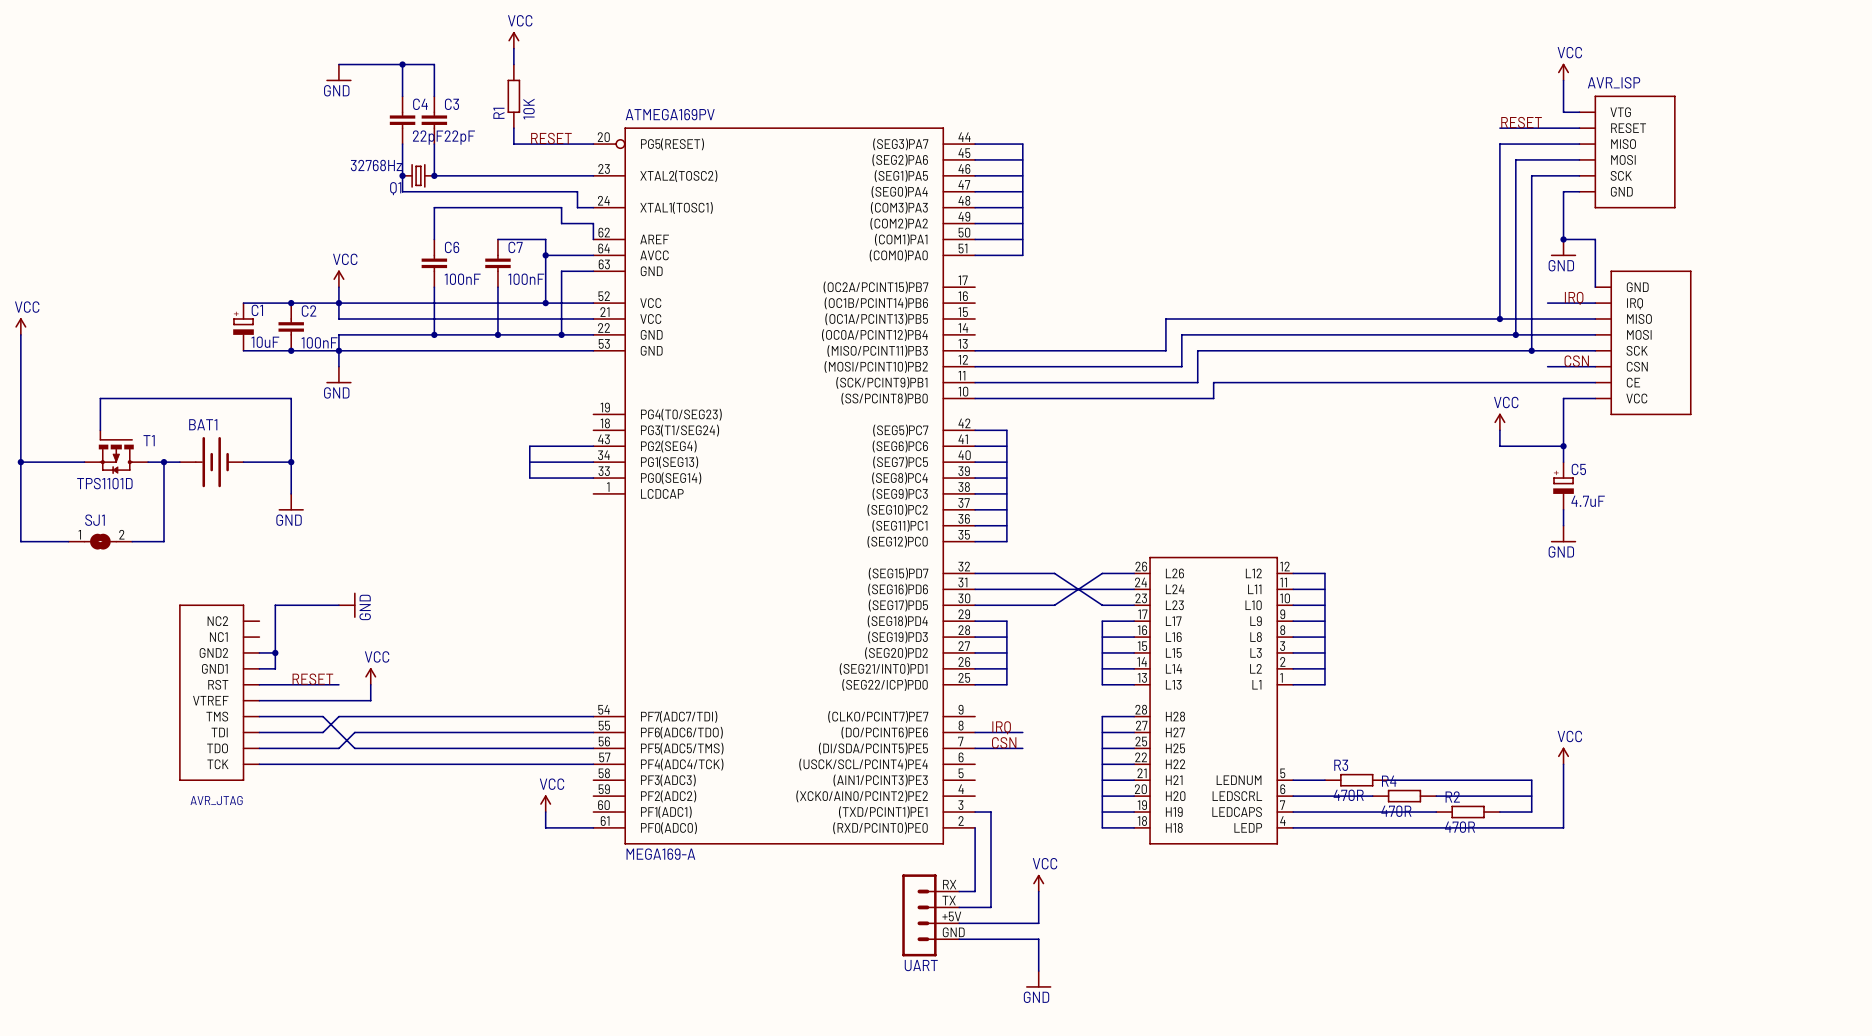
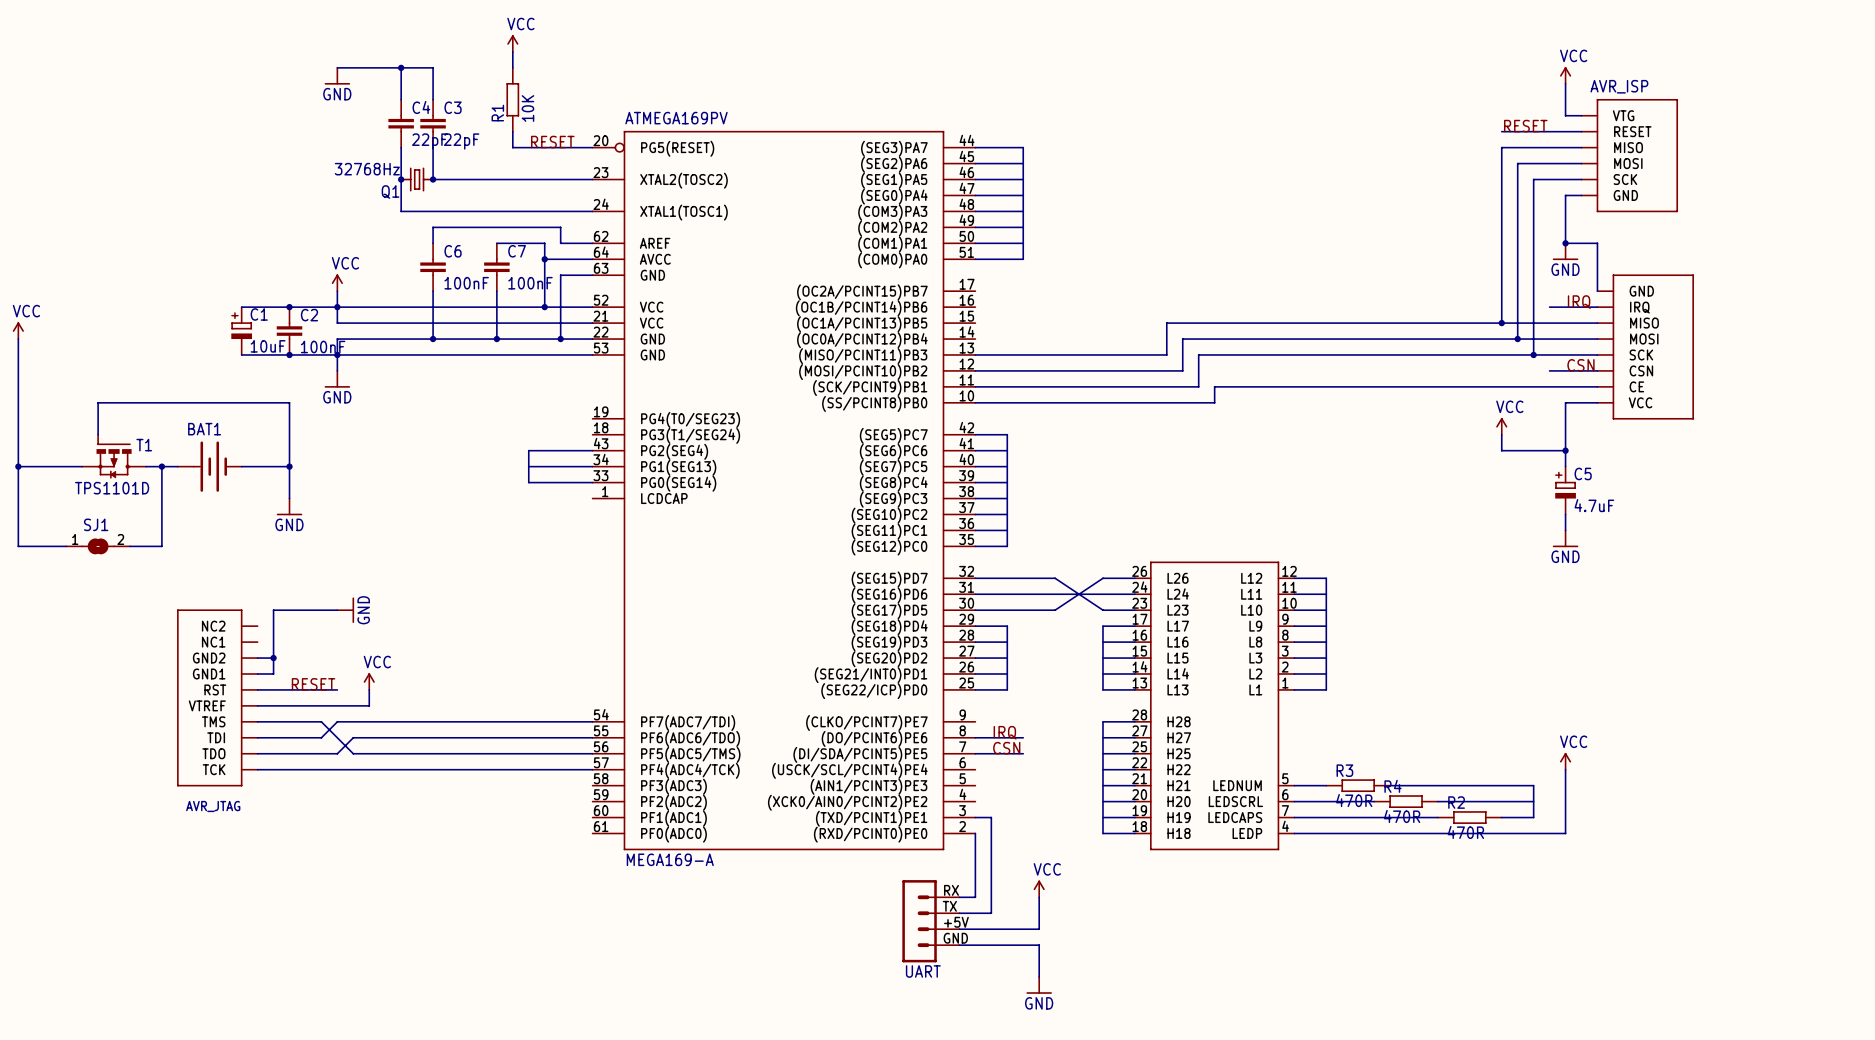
wire: (402, 191) (577, 191) (577, 207) -> none
wire: (434, 207) (434, 223) -> (433, 211) (401, 211) (401, 195)
wire: (561, 207) (561, 223) (593, 223) (593, 239) -> (560, 211) (576, 211)
wire: none -> (433, 227) (560, 227) (560, 243) (592, 243)
power symbol: VCC (545, 803) -> none
wire: (545, 812) (545, 827) (593, 827) -> none

